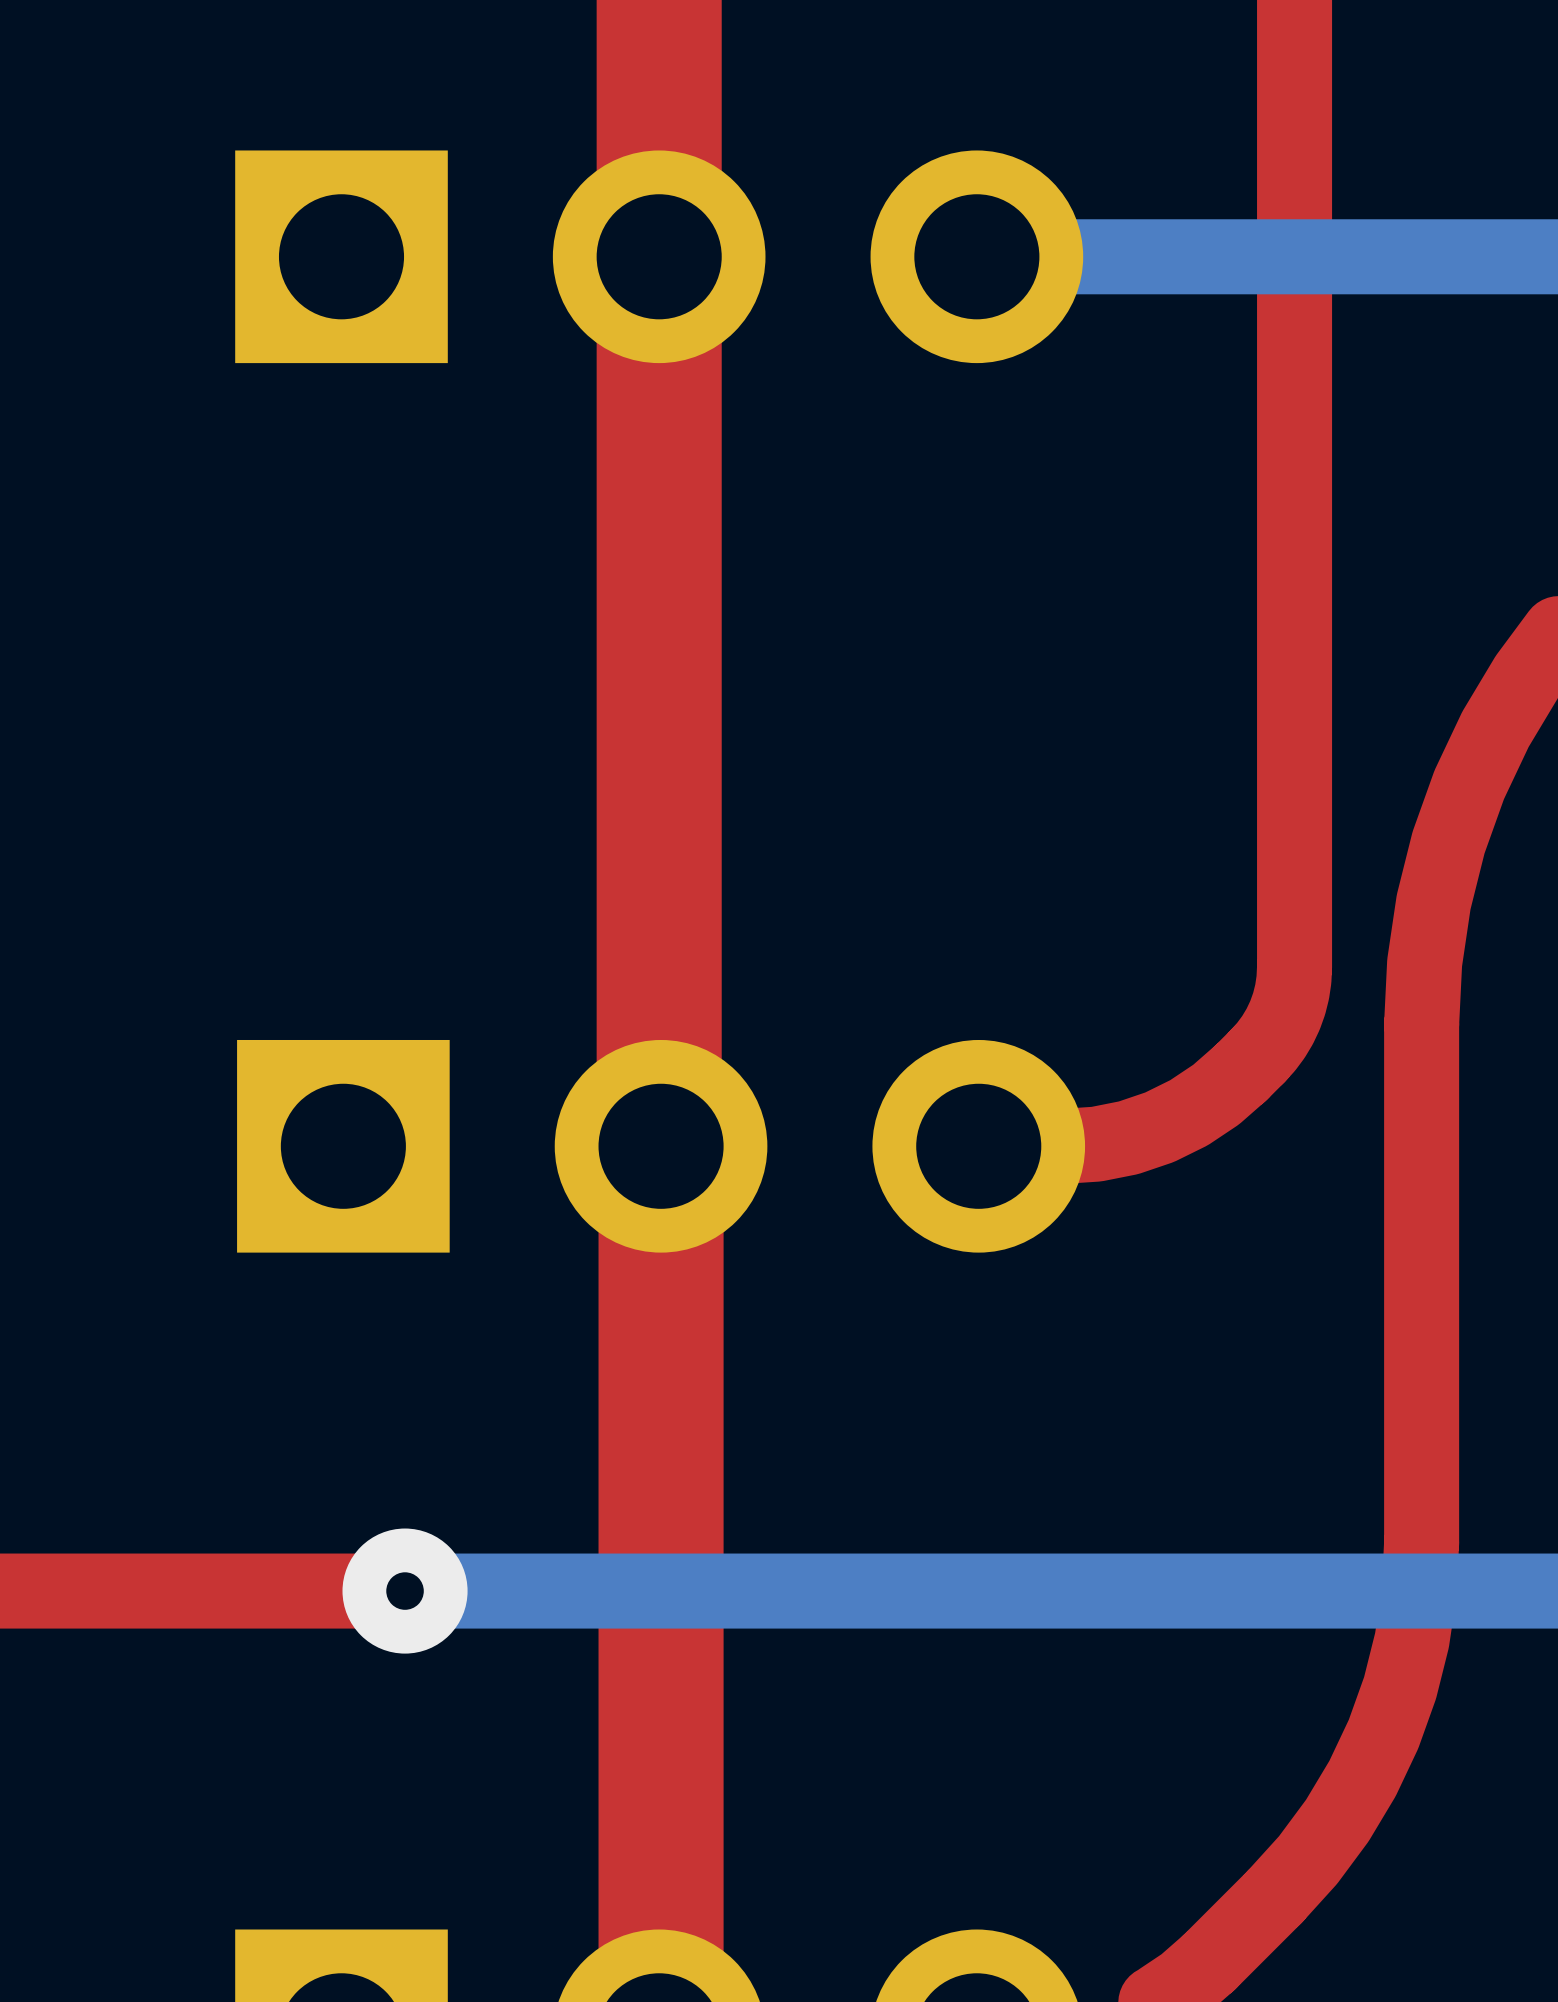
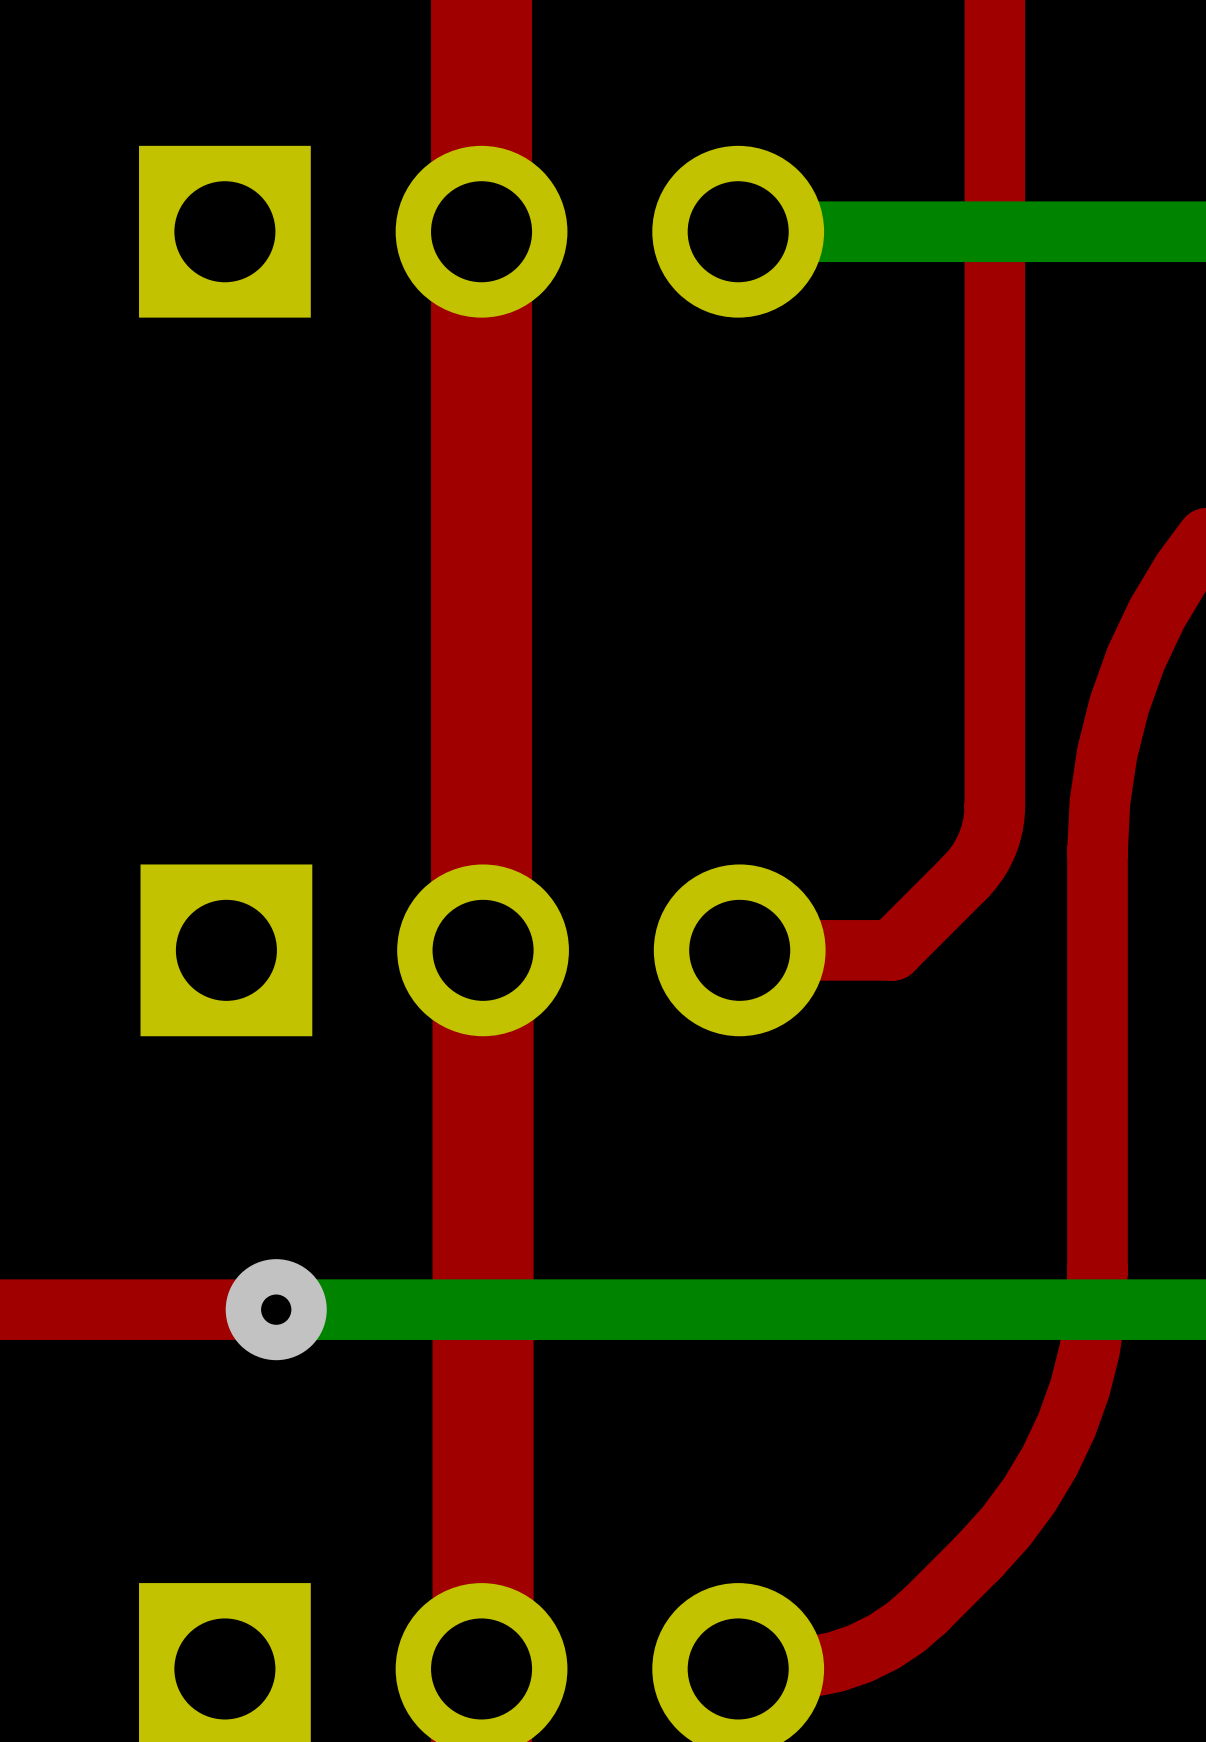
top track: (1240, 1073) (1216, 1094) (1188, 1112) (1159, 1127) (1128, 1137) (1096, 1144) (1063, 1146) -> (951, 891) (892, 950) (808, 950)

